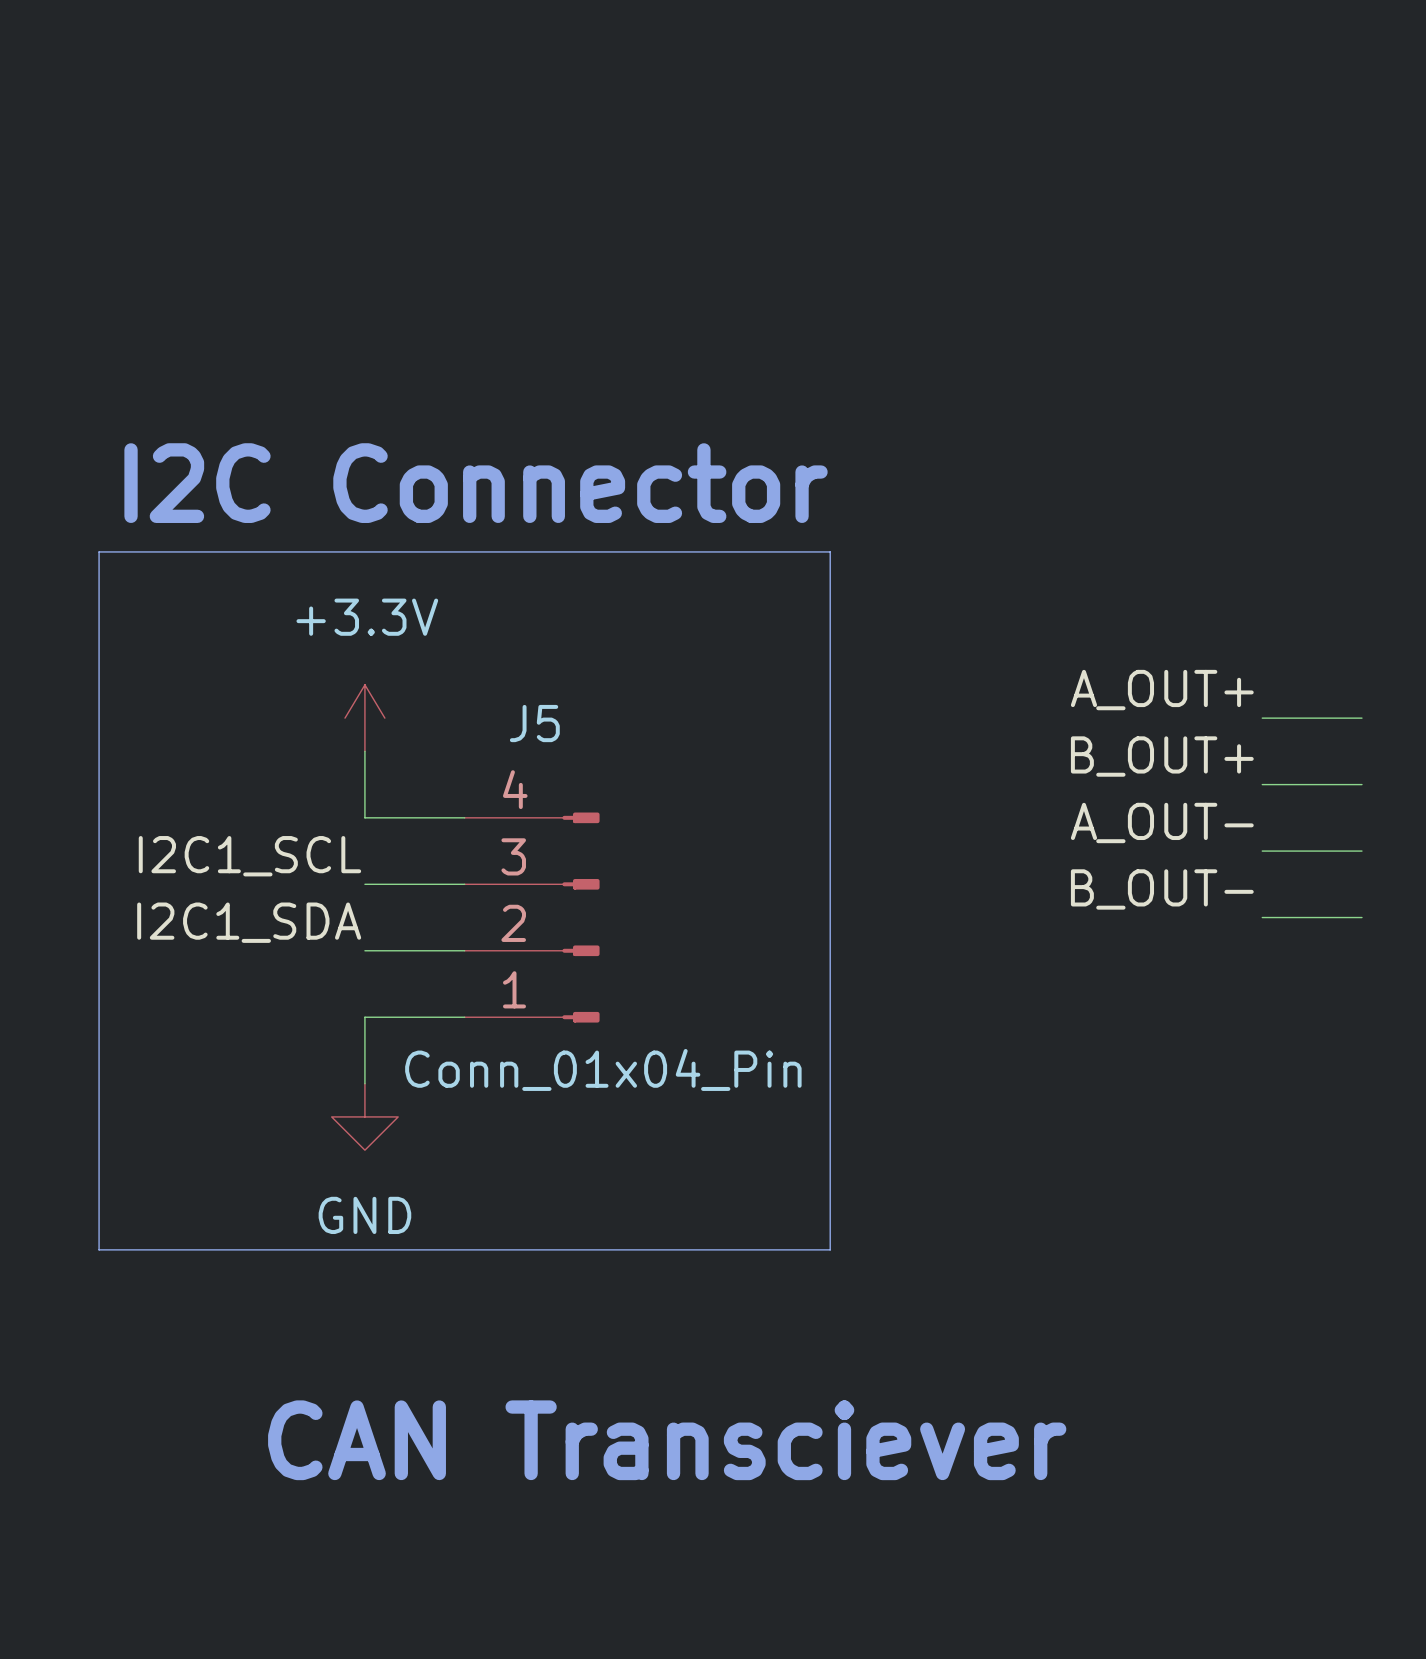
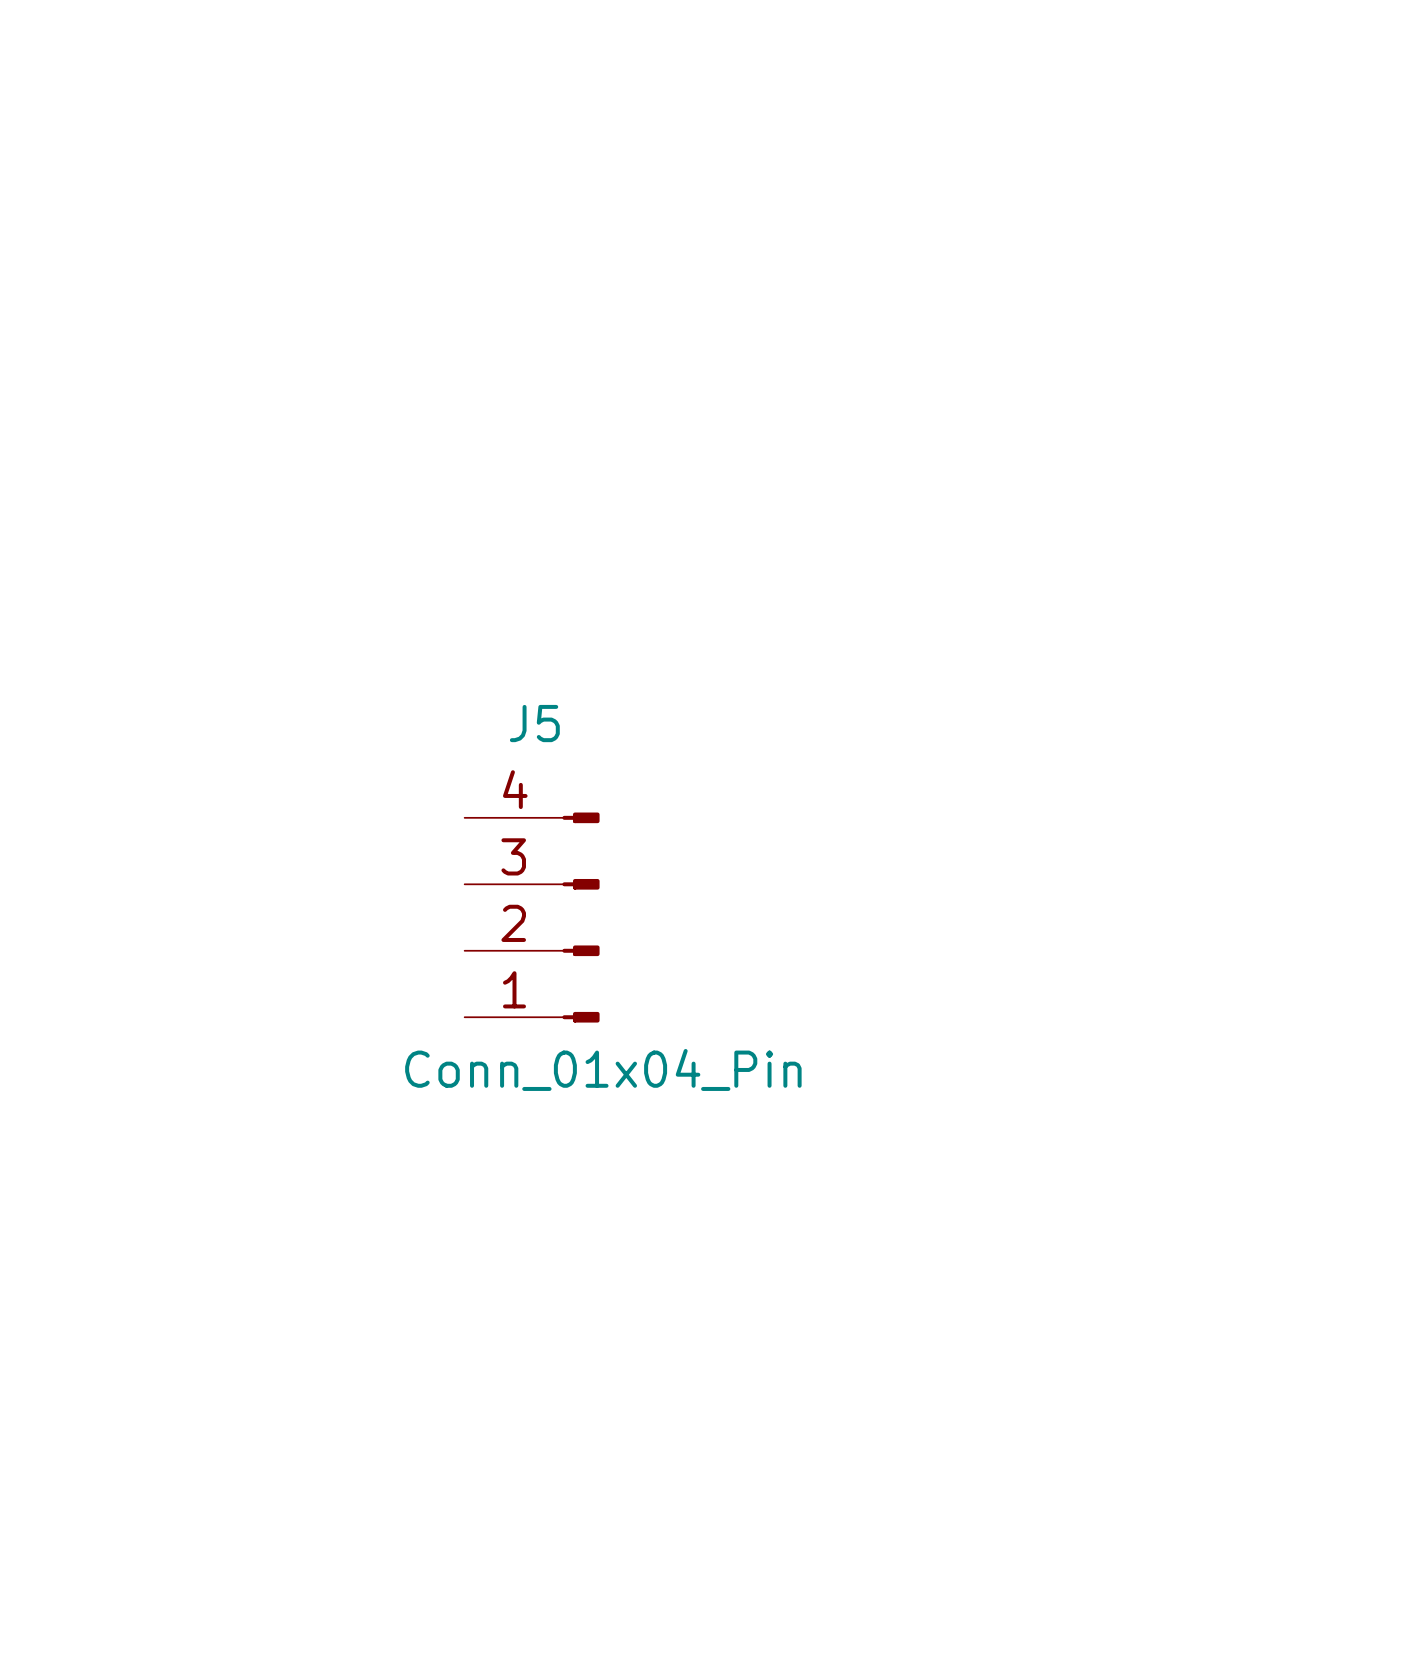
text: I2C Connector (476, 483) -> none
line: (99, 551) (830, 551) (830, 1249) (99, 1249) (99, 551) -> none
label: A_OUT+ (1162, 690) -> none
power symbol: +3.3V (364, 718) -> none
wire: (1262, 718) (1361, 718) -> none
wire: (364, 751) (364, 817) (464, 817) -> none
label: B_OUT+ (1162, 756) -> none
wire: (1262, 784) (1361, 784) -> none
label: A_OUT- (1162, 822) -> none
wire: (1262, 851) (1361, 851) -> none
label: I2C1_SCL (249, 856) -> none
wire: (364, 884) (464, 884) -> none
label: B_OUT- (1162, 889) -> none
wire: (1262, 917) (1361, 917) -> none
label: I2C1_SDA (249, 922) -> none
wire: (364, 950) (464, 950) -> none
wire: (464, 1017) (364, 1017) (364, 1083) -> none
power symbol: GND (364, 1116) -> none
text: CAN Transciever (667, 1440) -> none

